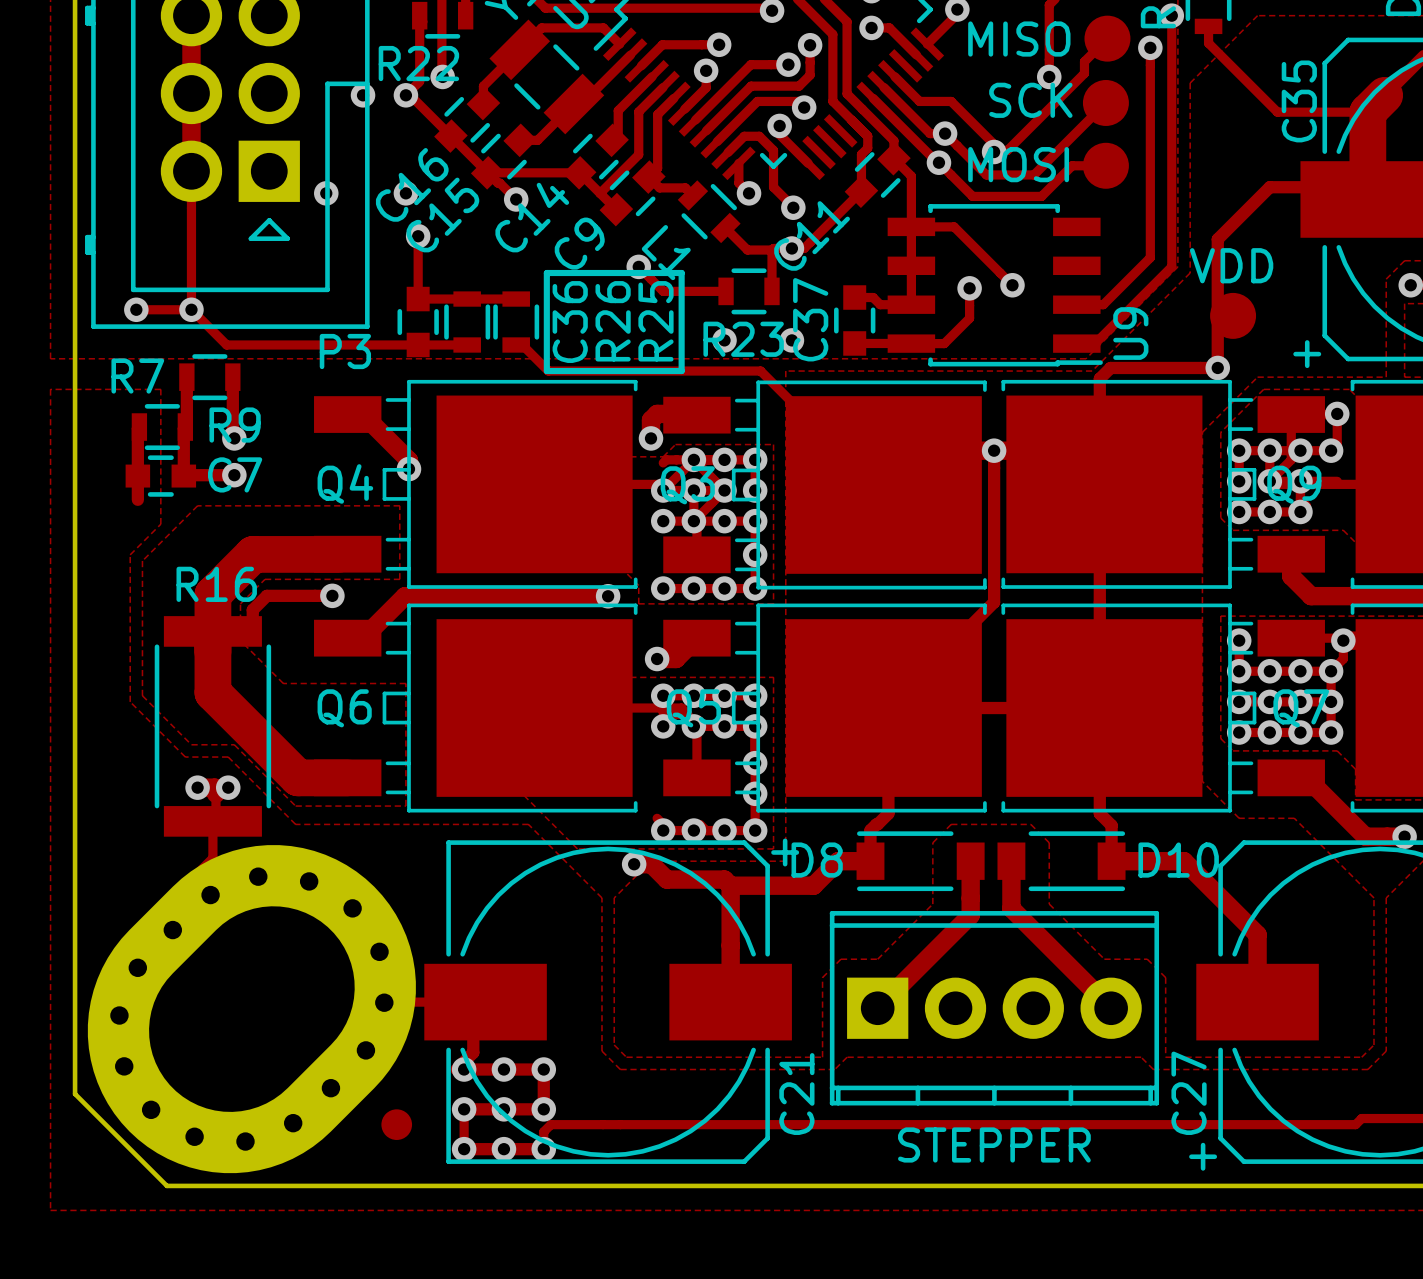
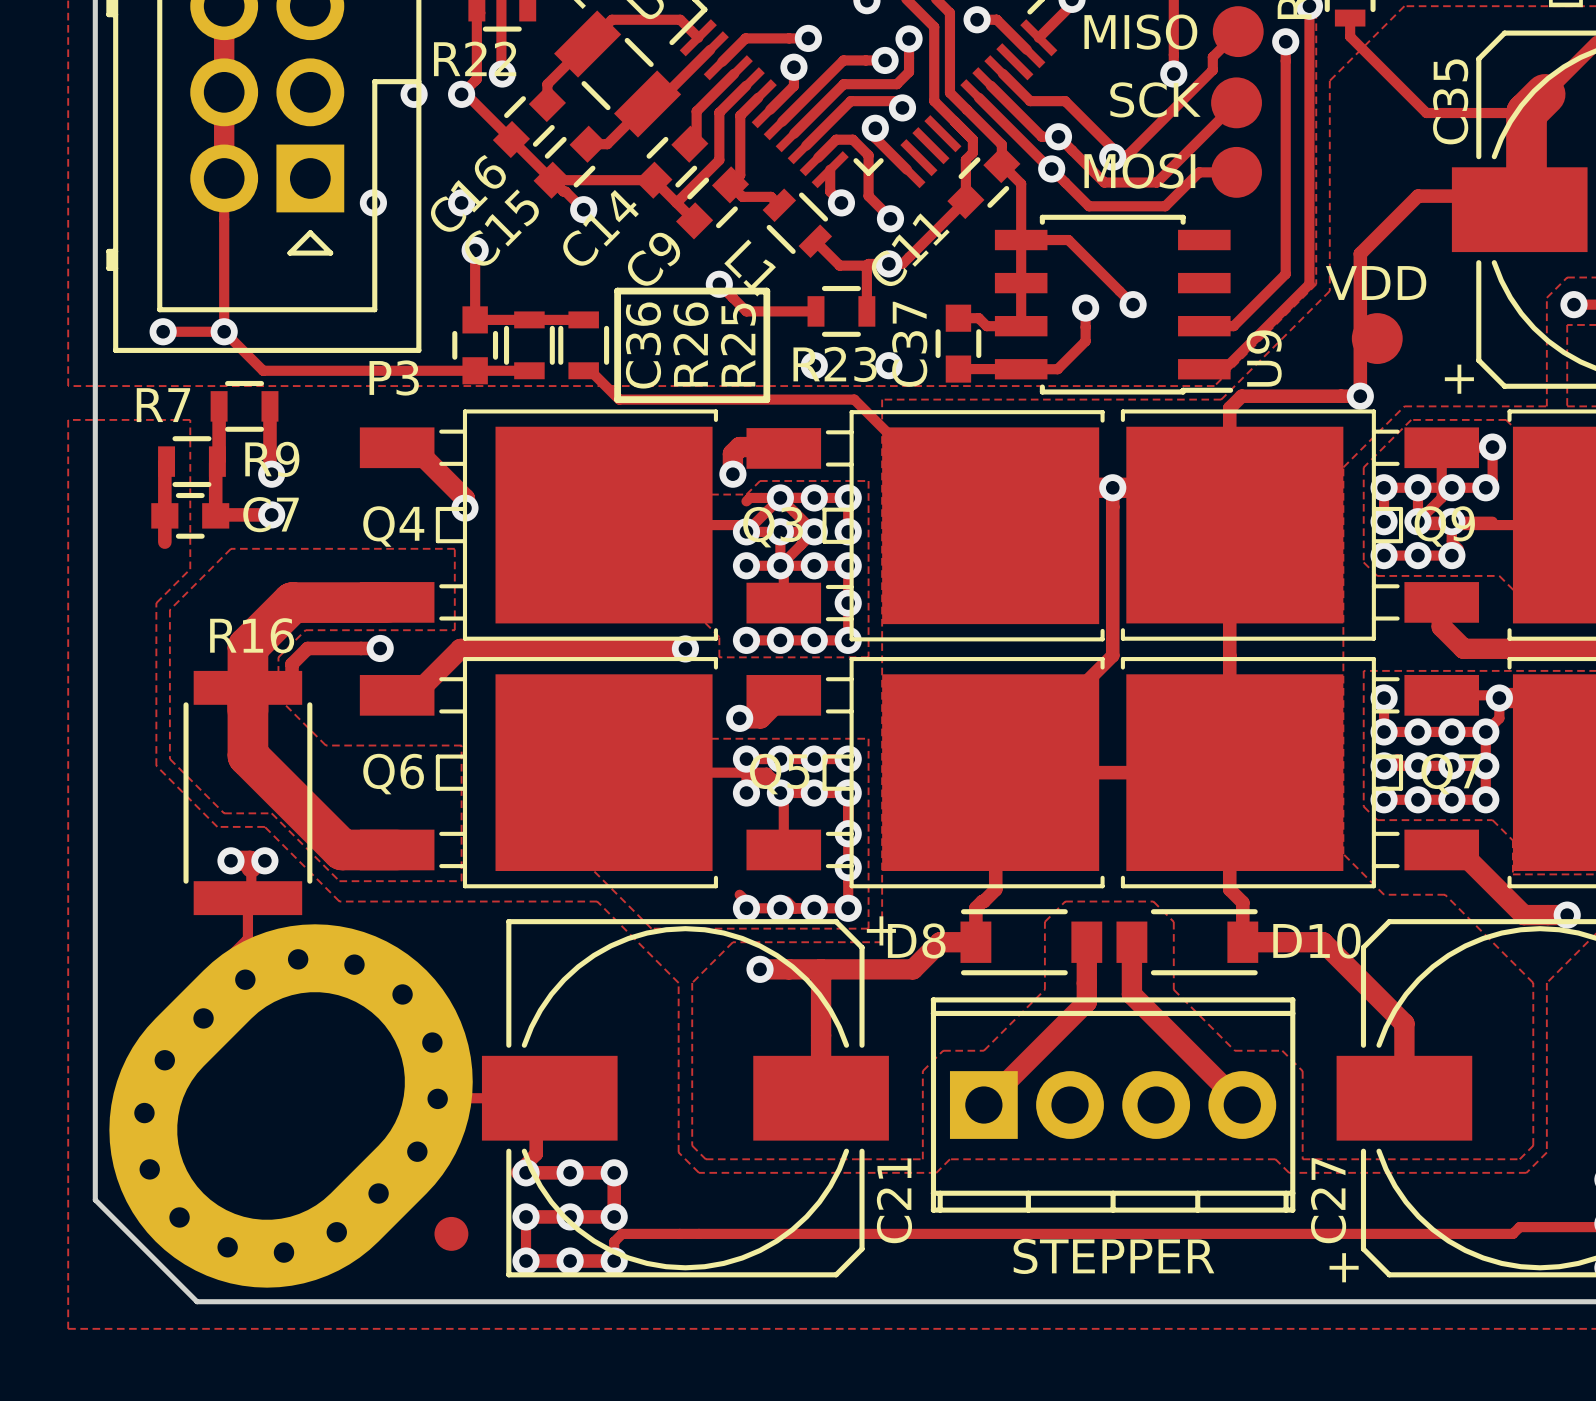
track: (634, 864) (651, 864) (666, 879) (724, 879) (730, 885) -> (760, 969) (821, 969)
via position: (634, 864) -> (760, 969)

